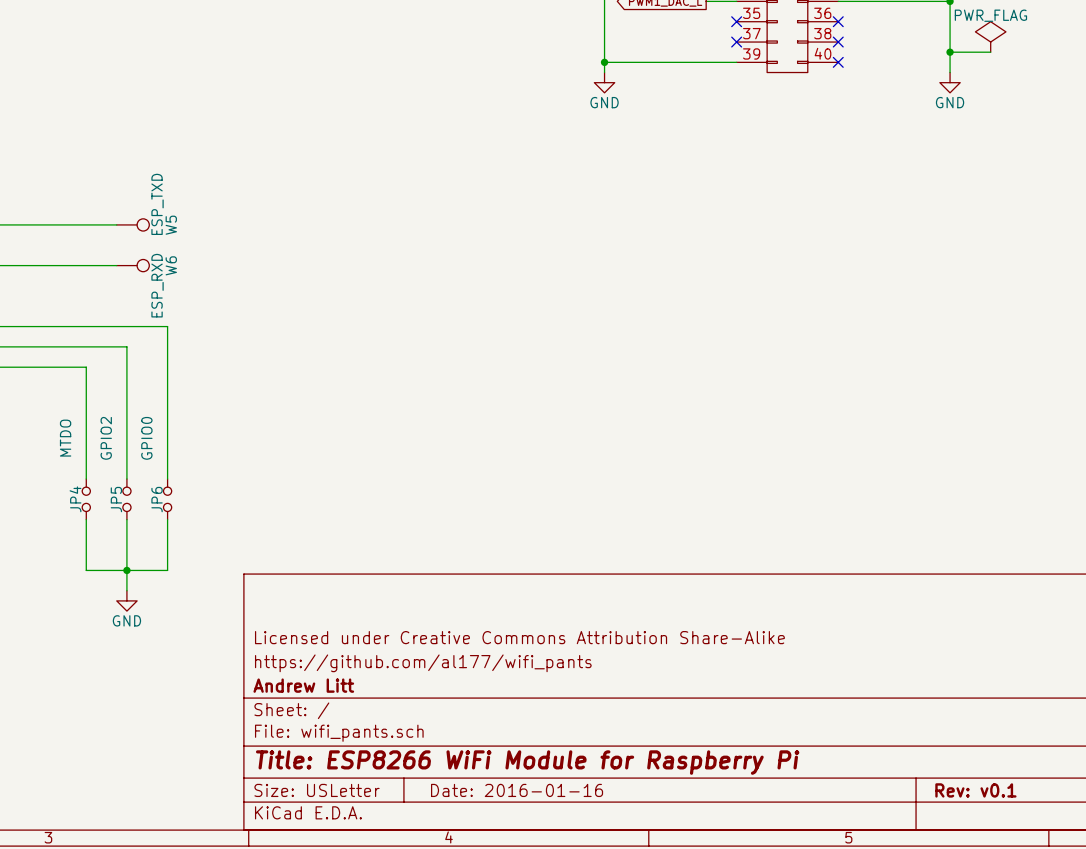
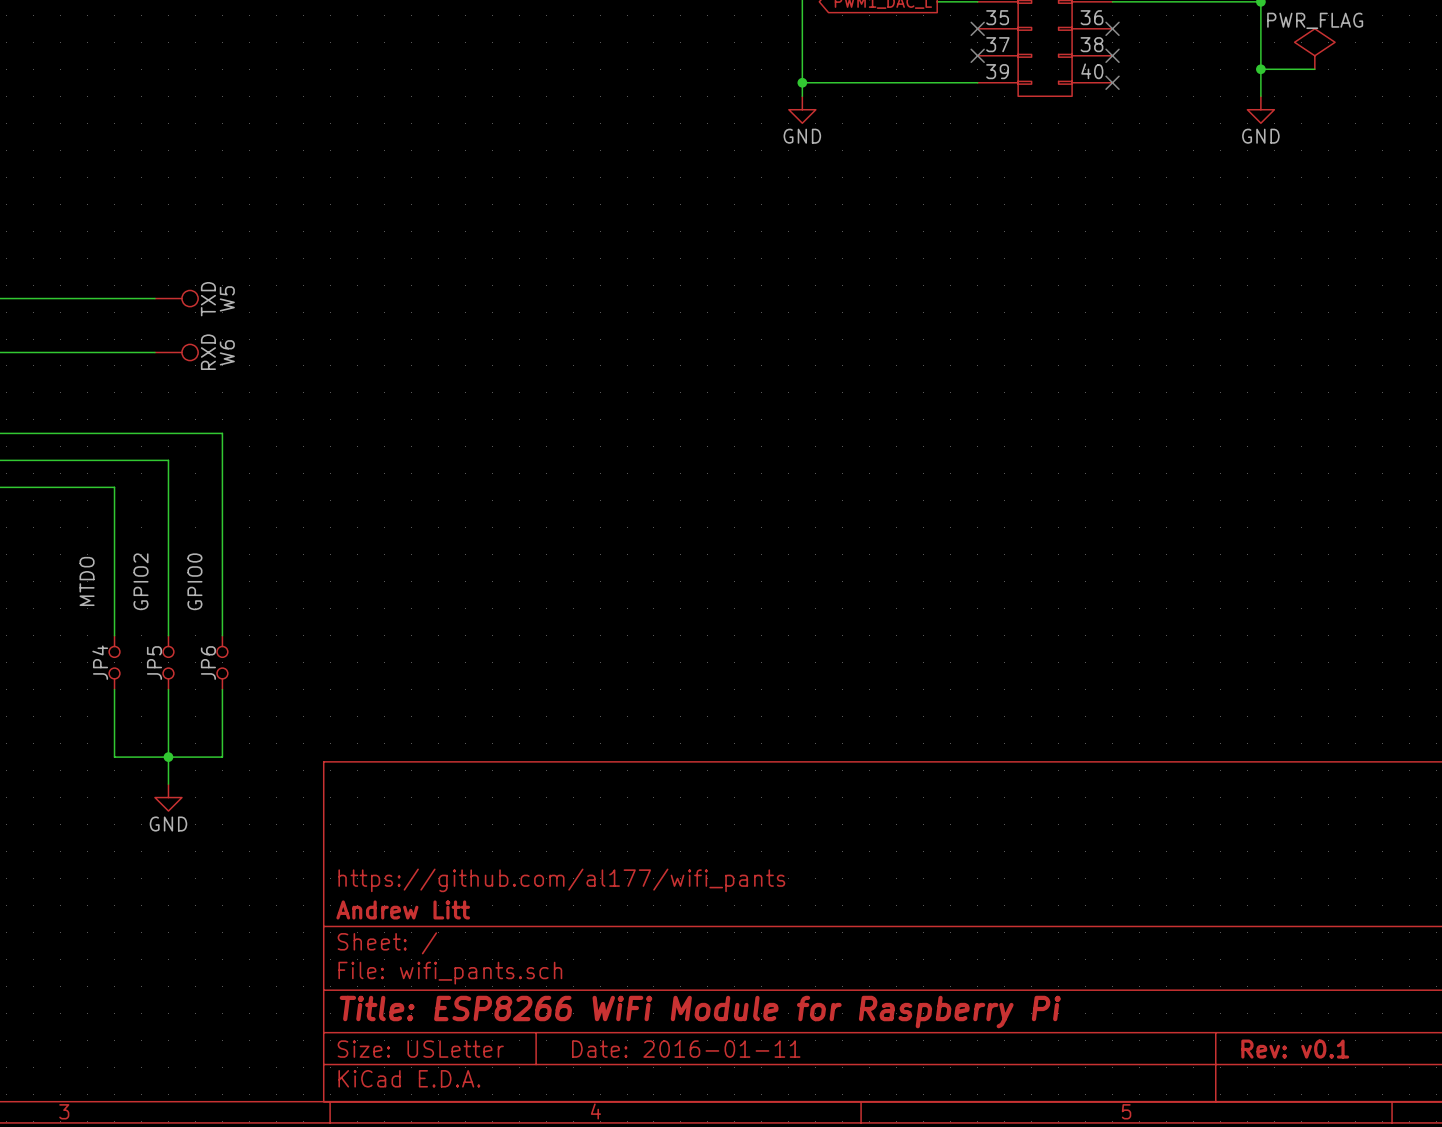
W5 value: ESP_TXD (157, 204) -> TXD (208, 299)
W6 value: ESP_RXD (157, 285) -> RXD (208, 352)
title block: Licensed under Creative Commons Attribution Share-Alike (519, 637) -> none
title block: Date: 2016-01-16 (517, 790) -> Date: 2016-01-11 (686, 1049)

